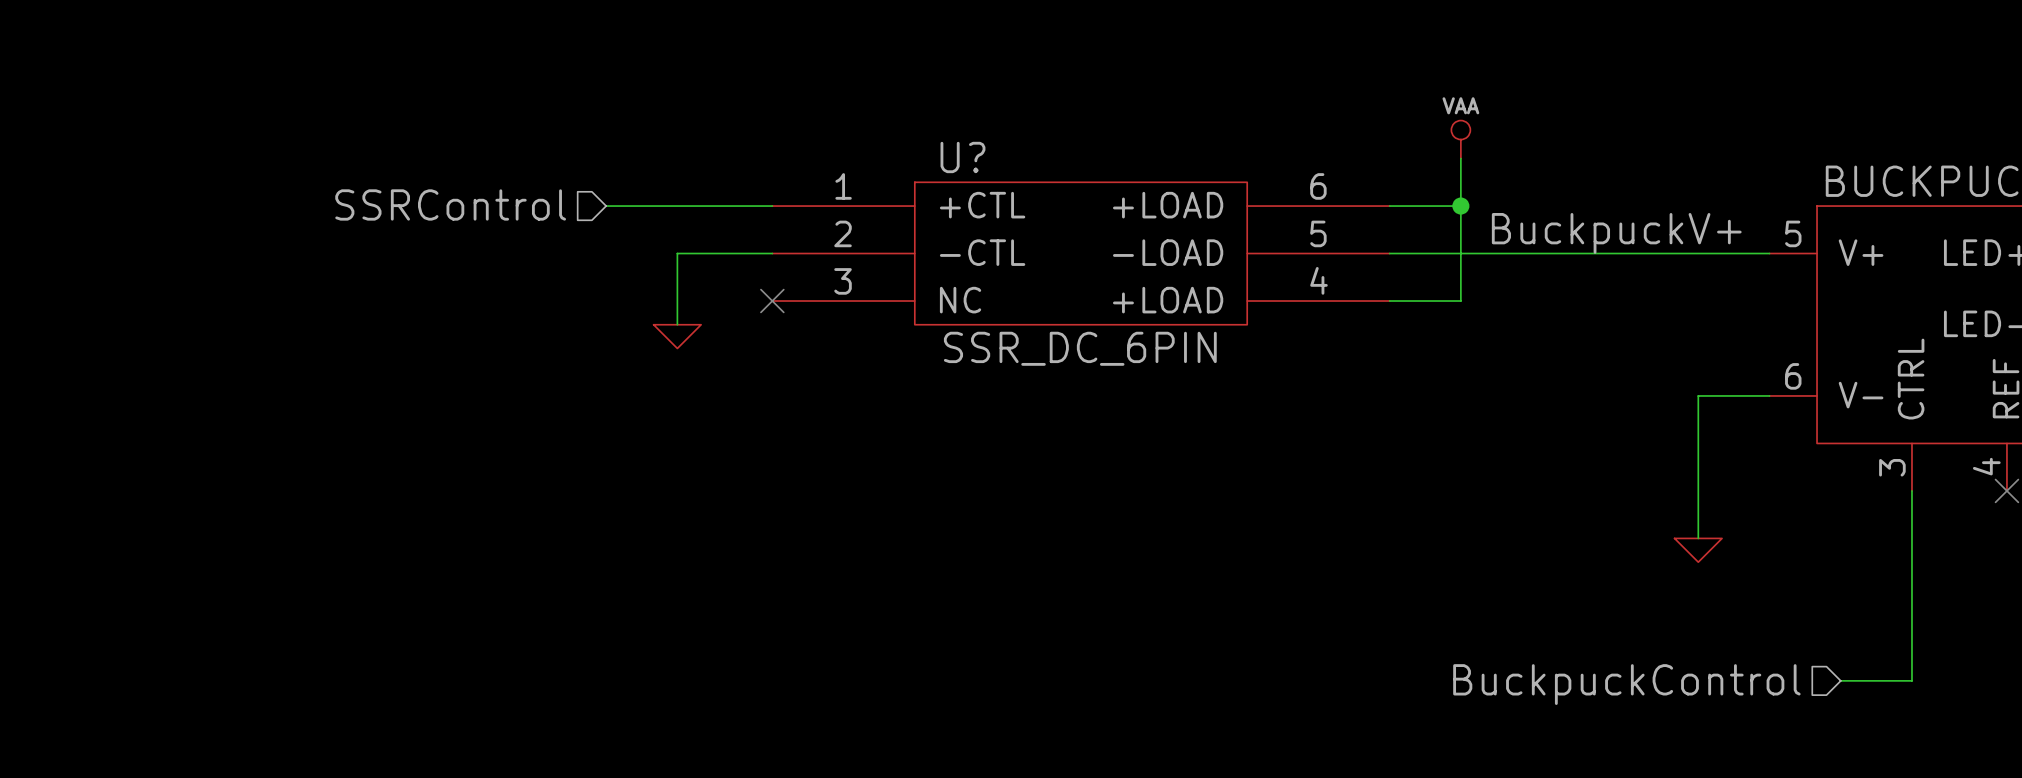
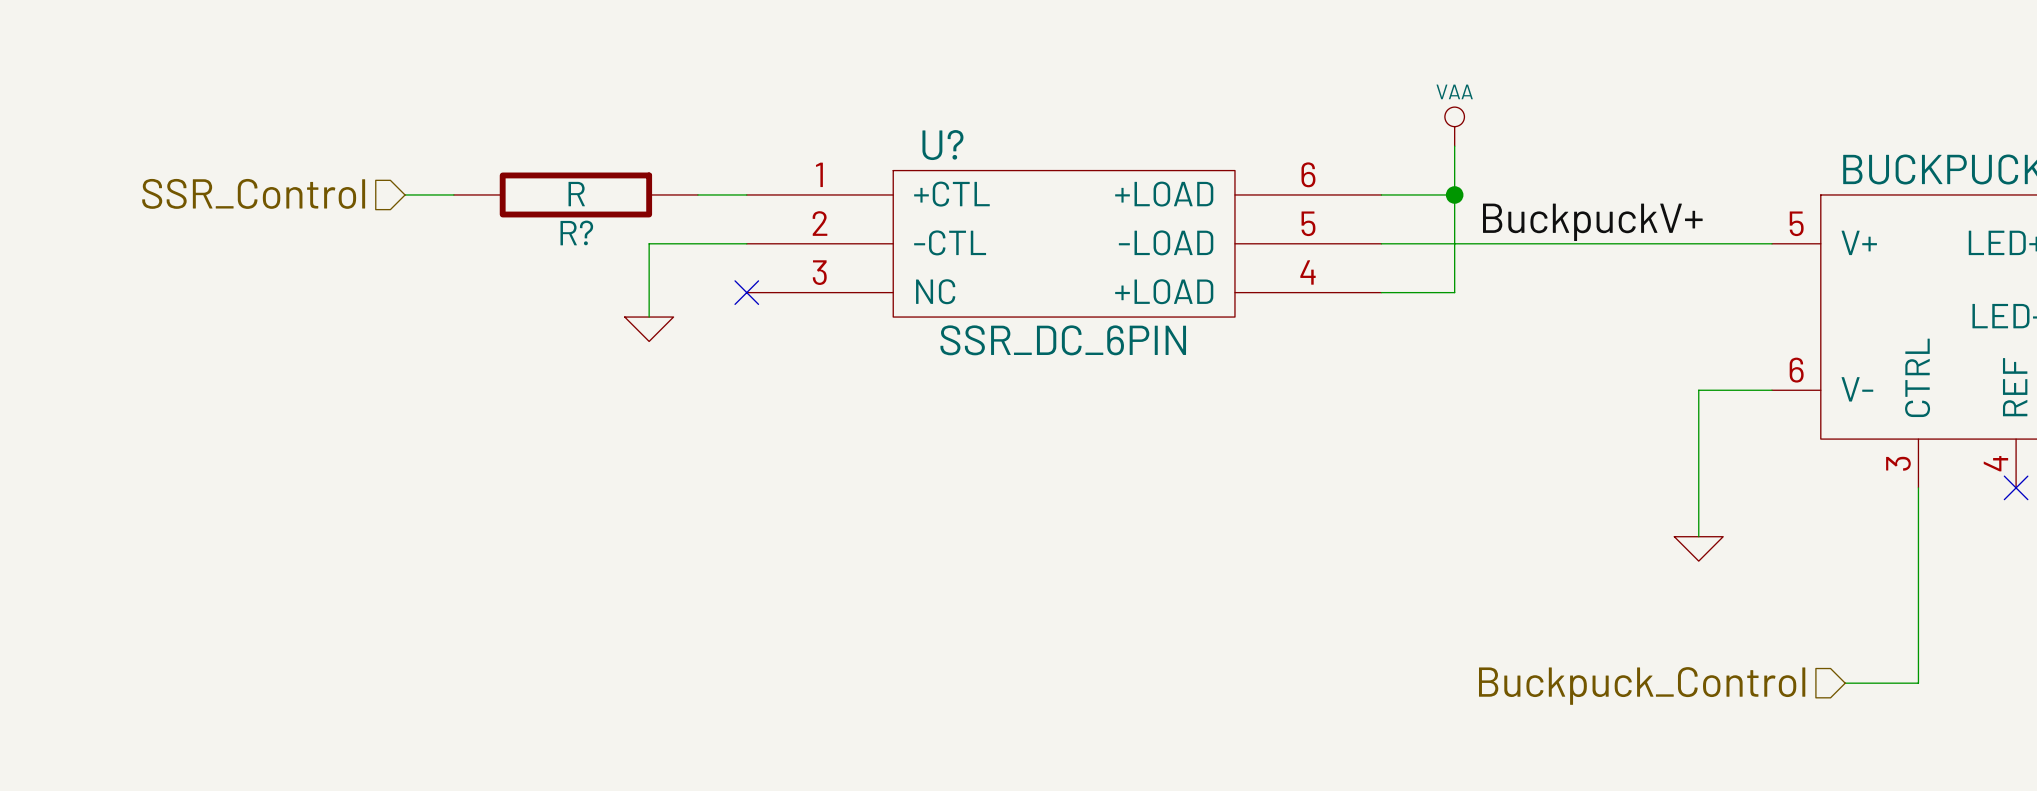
hierarchical label: SSRControl (450, 204) -> SSR_Control (253, 193)
wire: none -> (405, 194) (453, 194)
wire: (606, 206) (724, 206) -> none
R?: none -> R (575, 194)
hierarchical label: BuckpuckControl (1626, 684) -> Buckpuck_Control (1642, 685)

